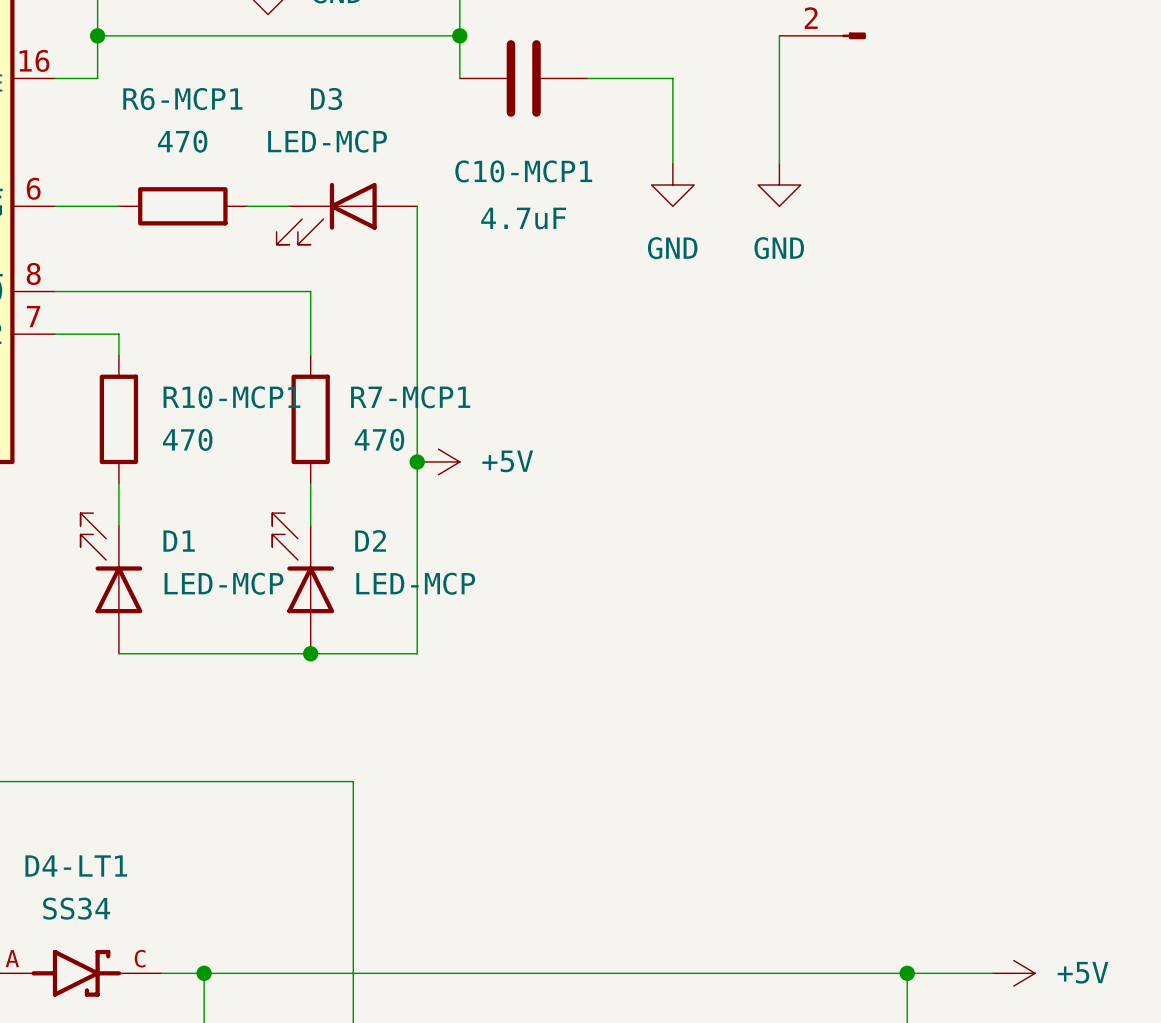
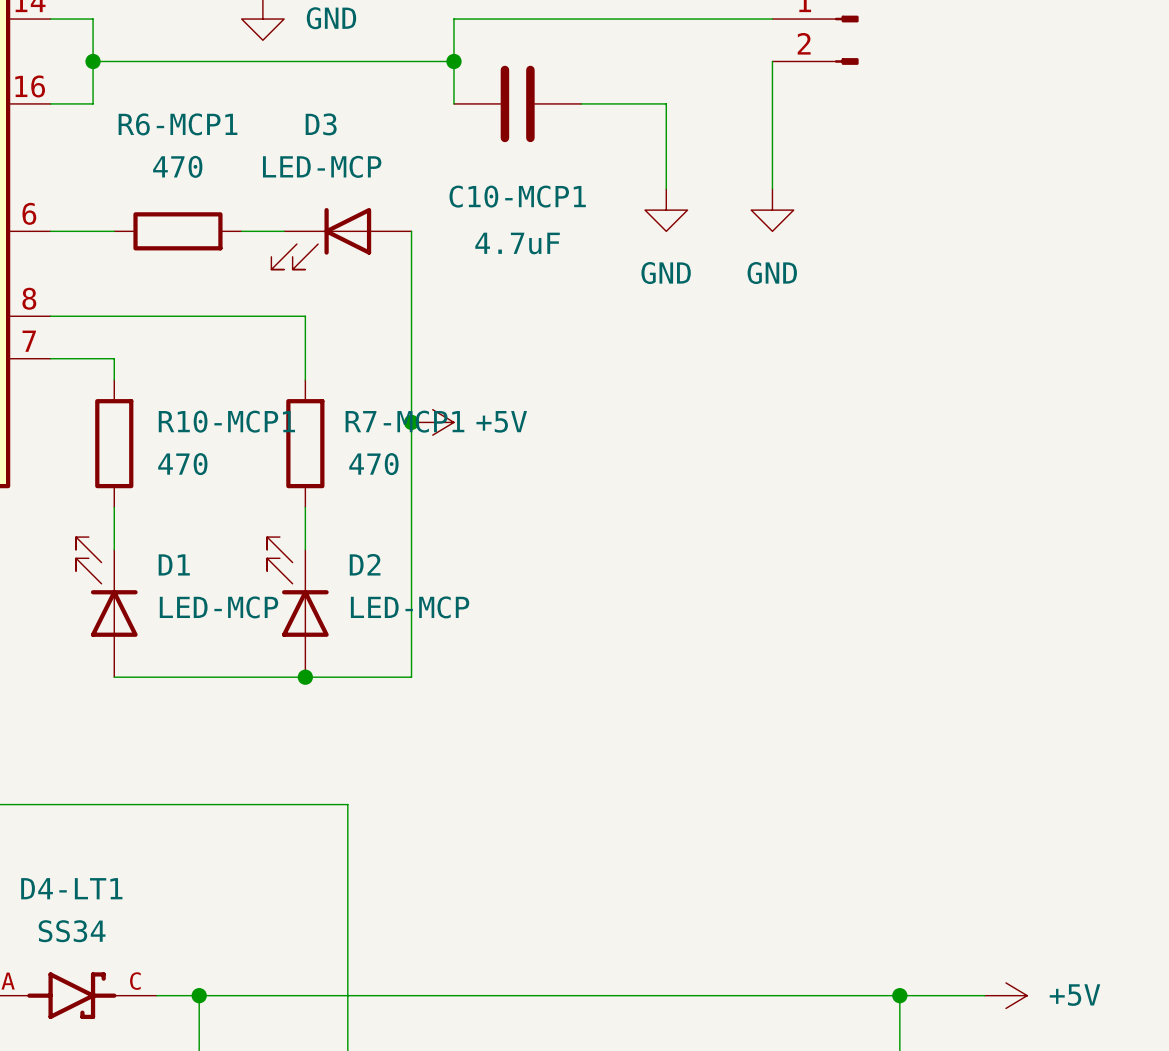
junction position: (417, 461) -> (411, 422)
power symbol position: +5V (438, 461) -> +5V (432, 422)

